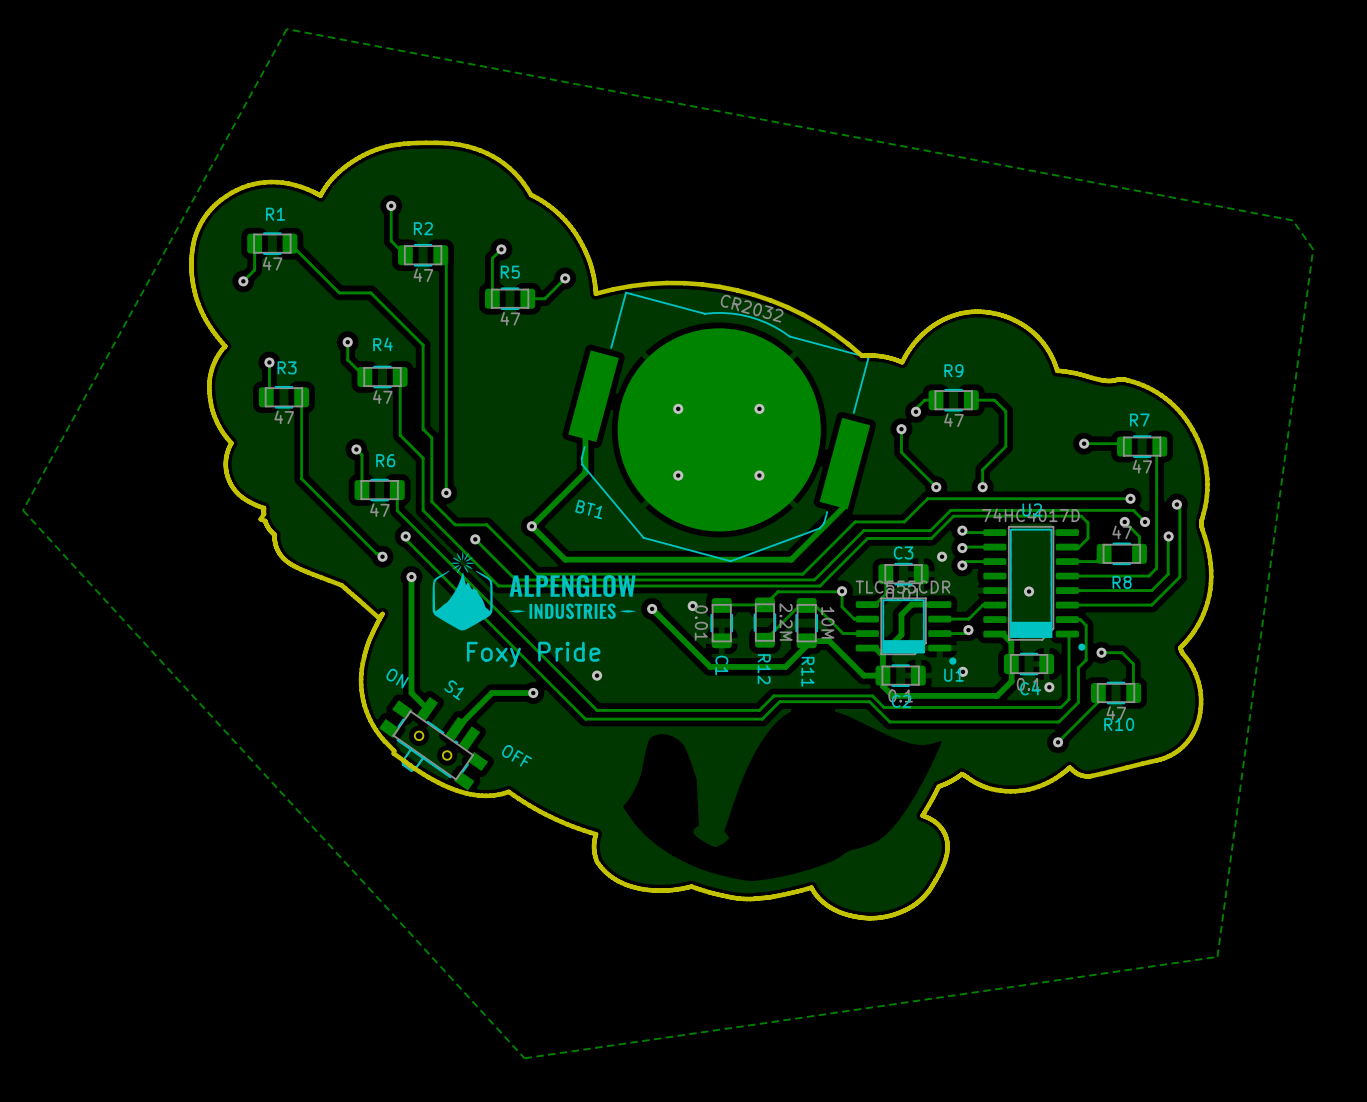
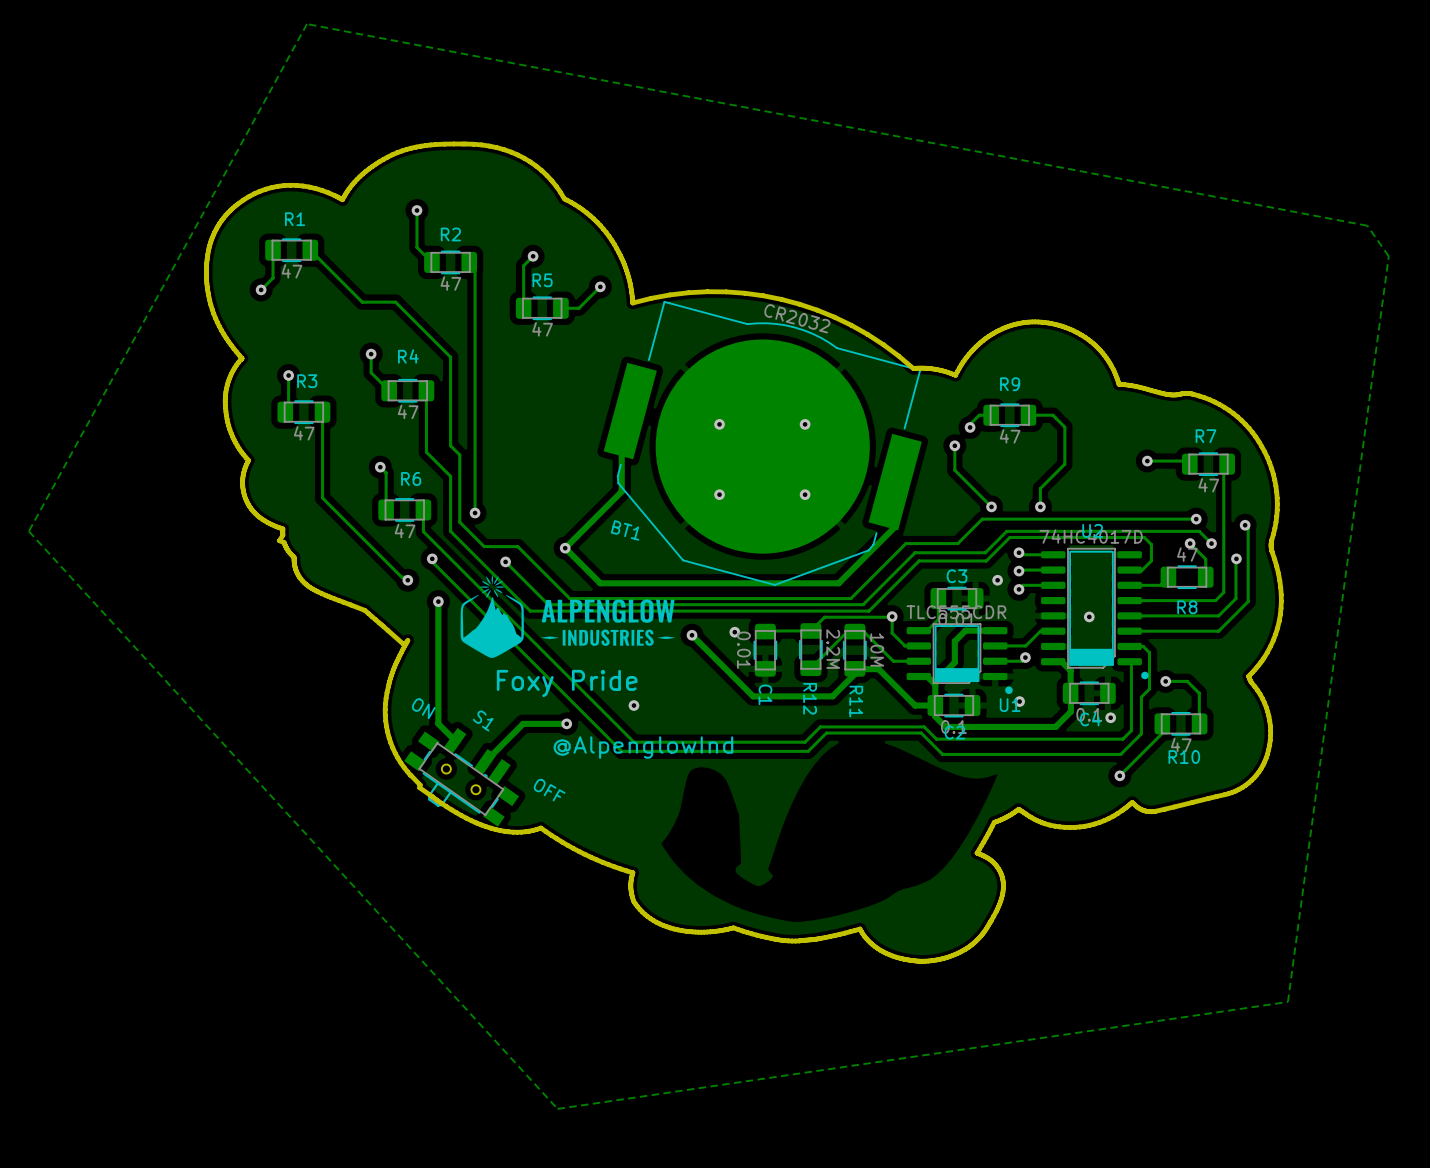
text: none -> @AlpenglowInd (643, 747)

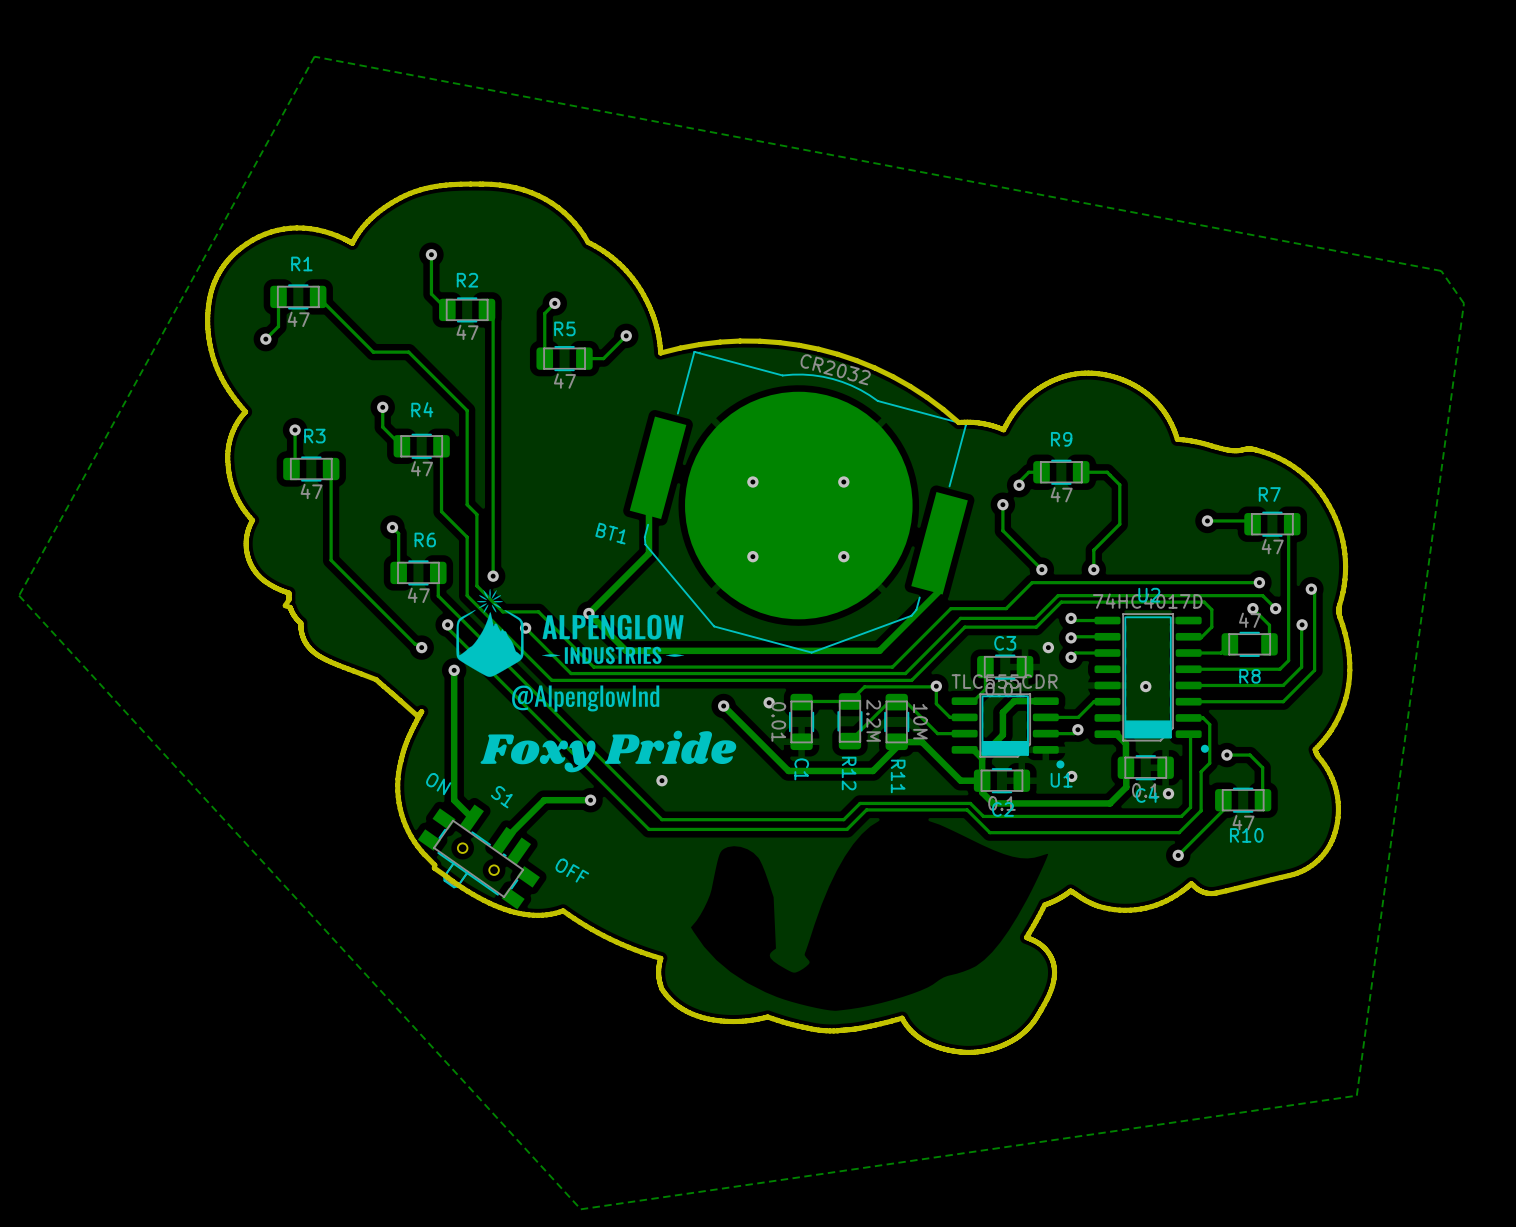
BT1 name position: BT1 (625, 530) -> BT1 (610, 533)
drawing: none -> [512, 685, 660, 712]
drawing position: (567, 616) -> (570, 632)
drawing: none -> [480, 730, 737, 773]
text: Foxy Pride (567, 683) -> none
text: @AlpenglowInd (643, 747) -> none

